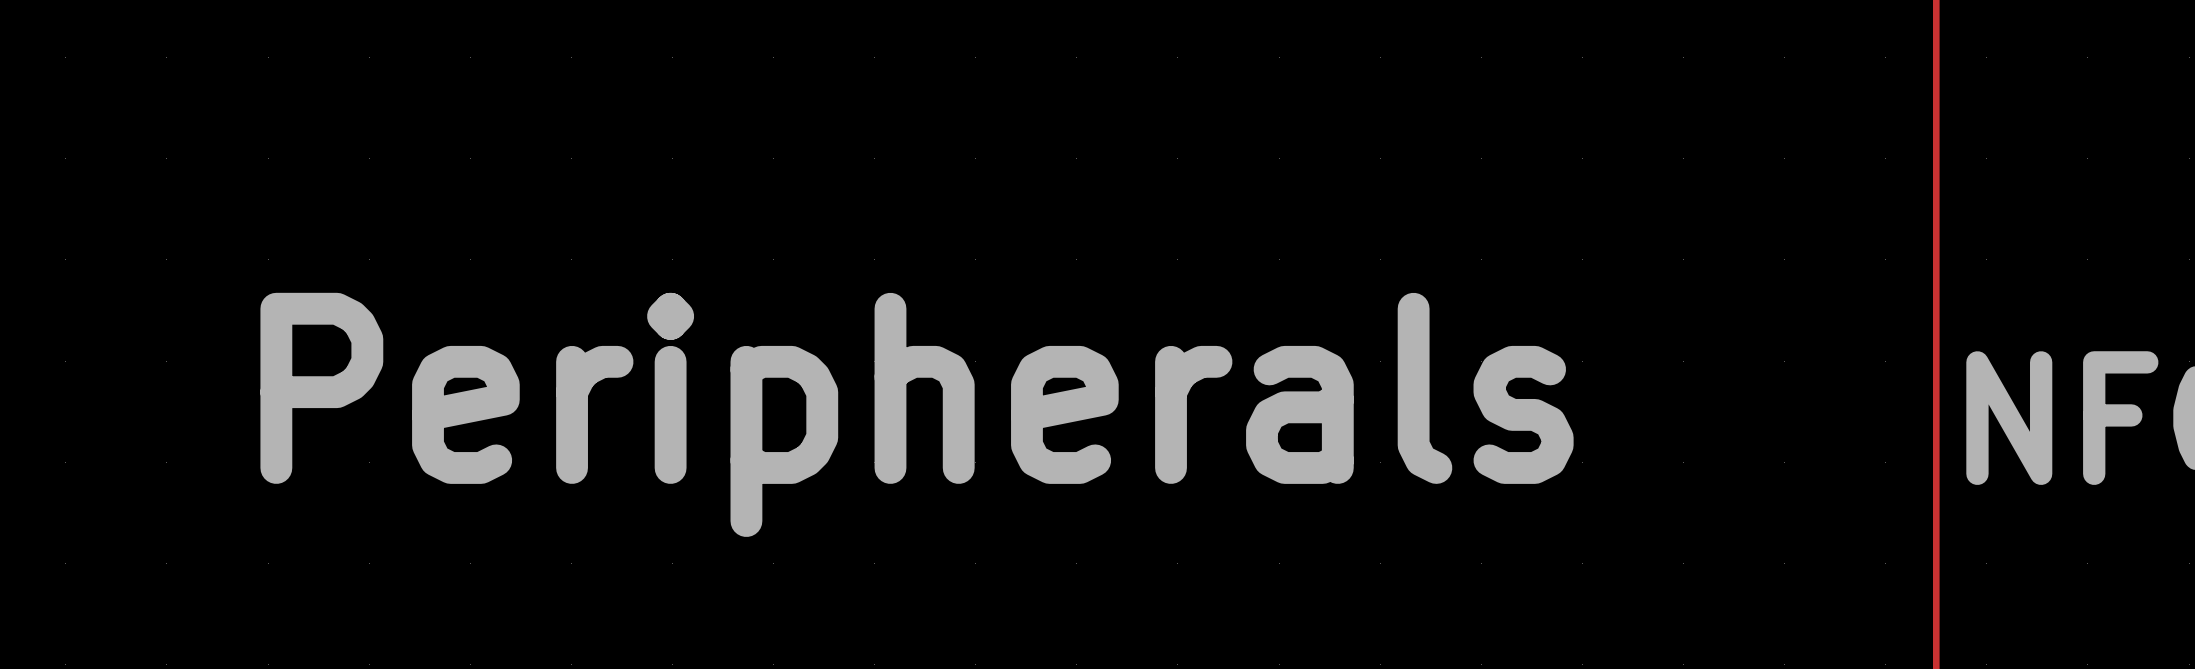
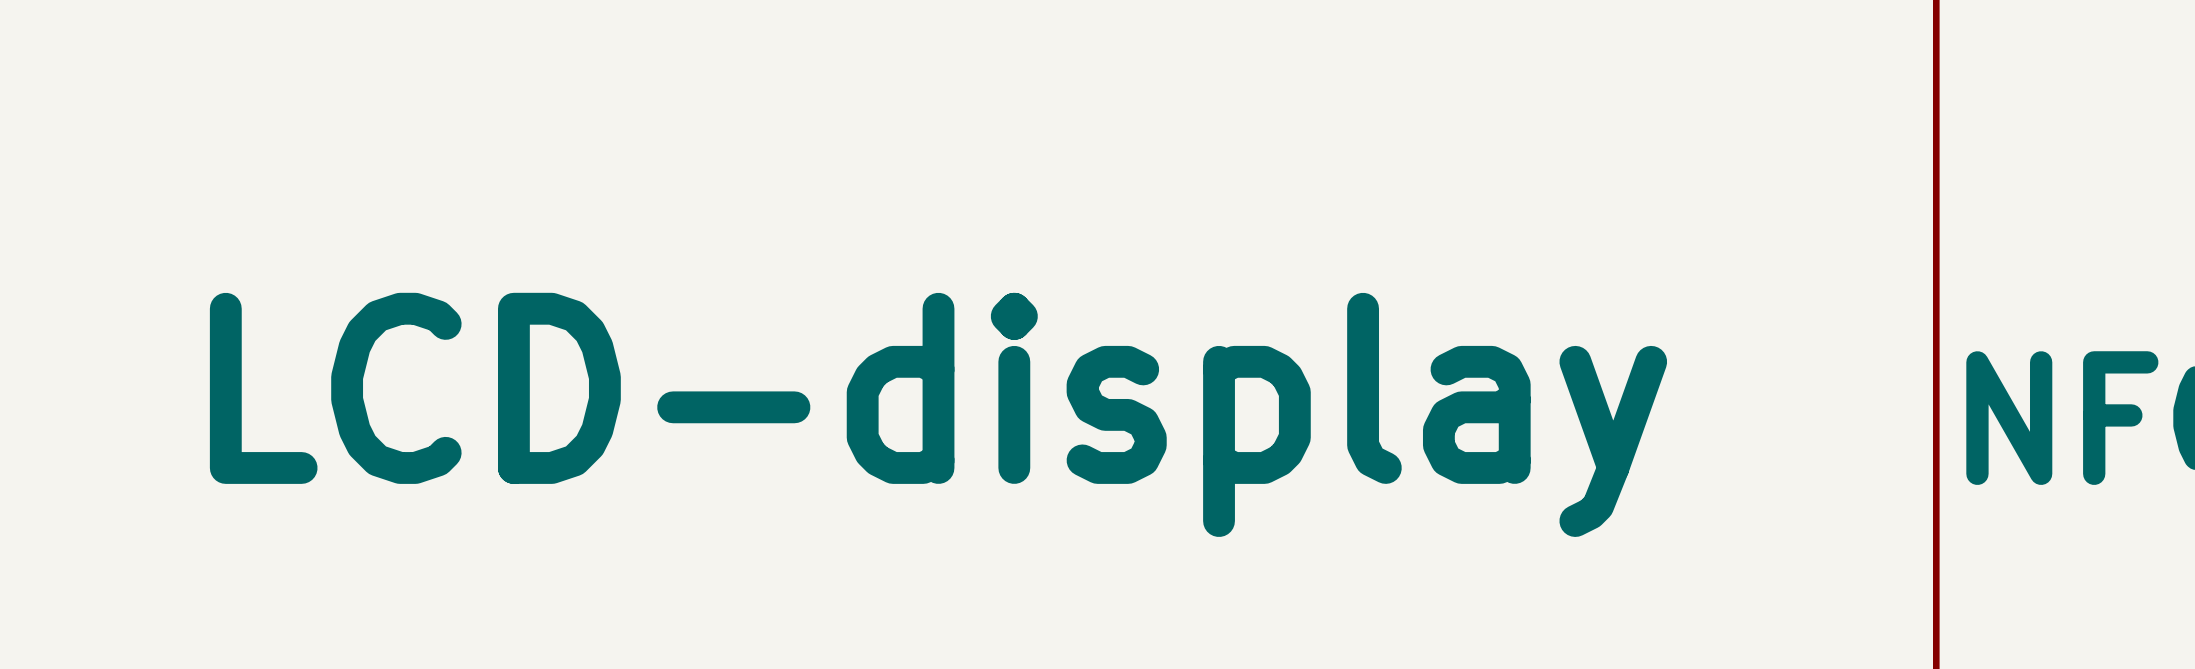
sheet Peripherals name: Peripherals (917, 414) -> LCD-display (938, 414)

